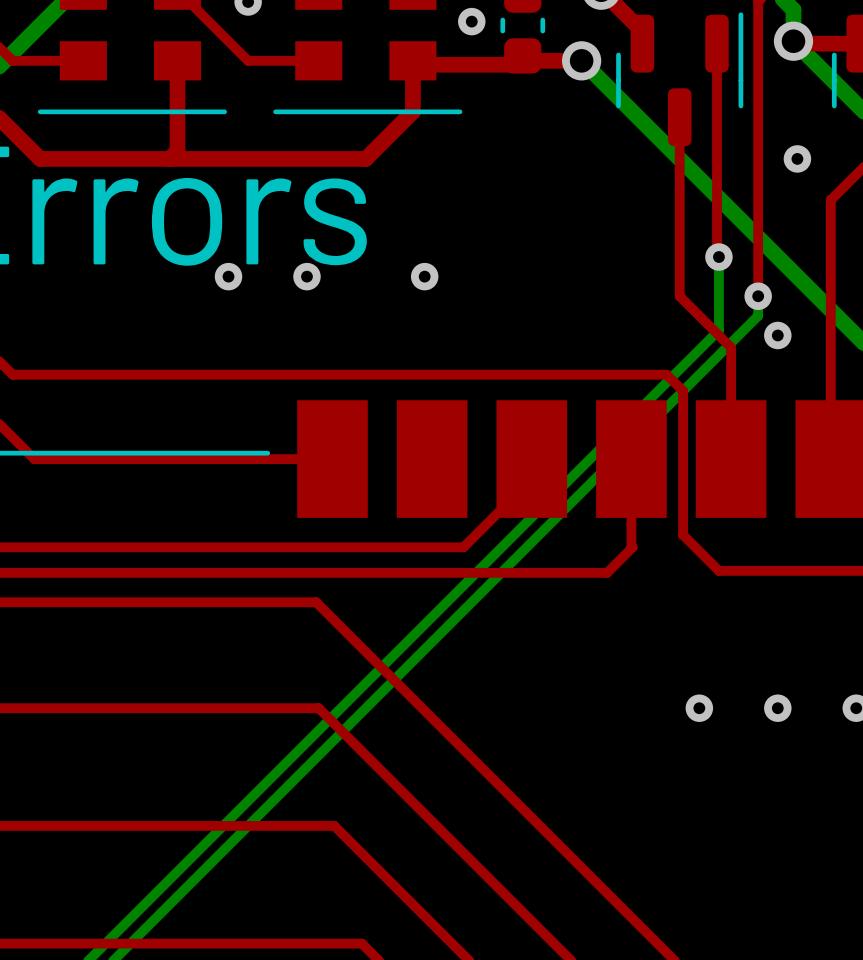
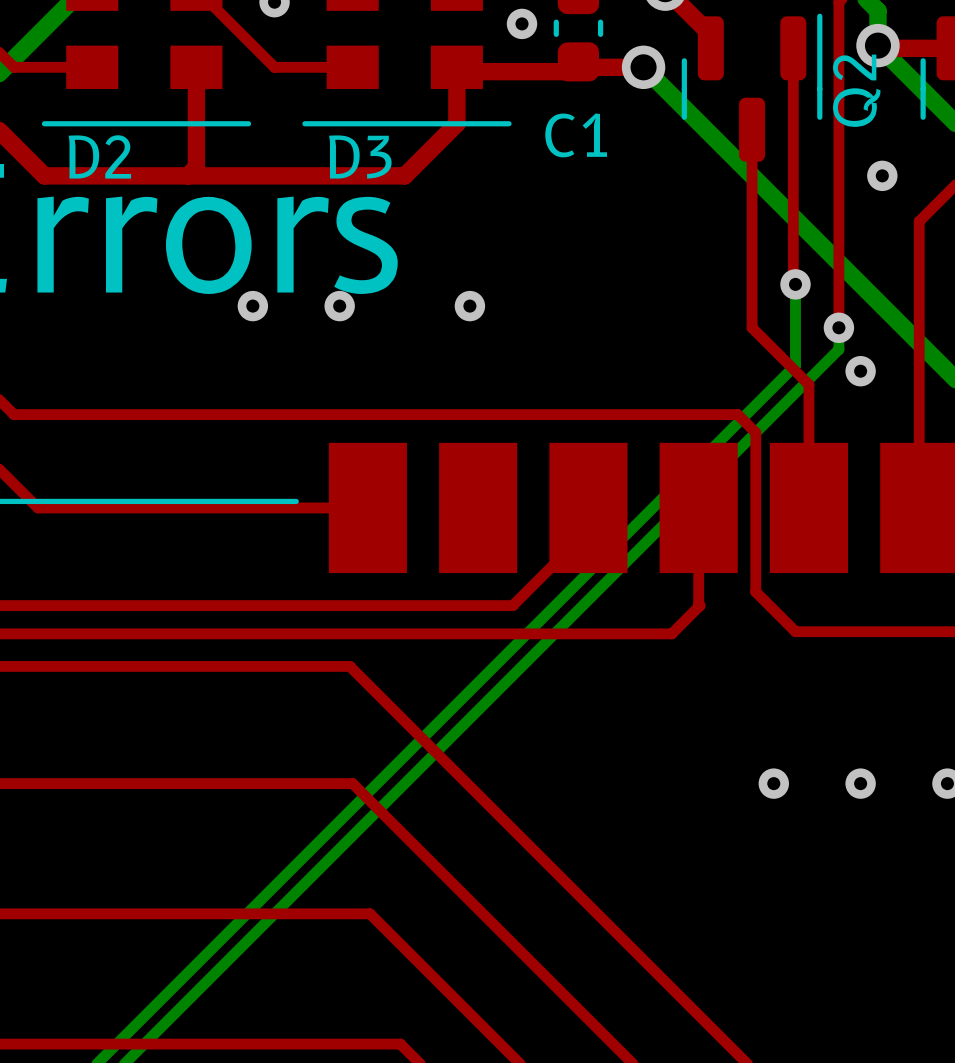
Q2 name: none -> Q2 (856, 90)
C1 name: none -> C1 (576, 135)
D2 name: none -> D2 (99, 156)
D3 name: none -> D3 (360, 156)

